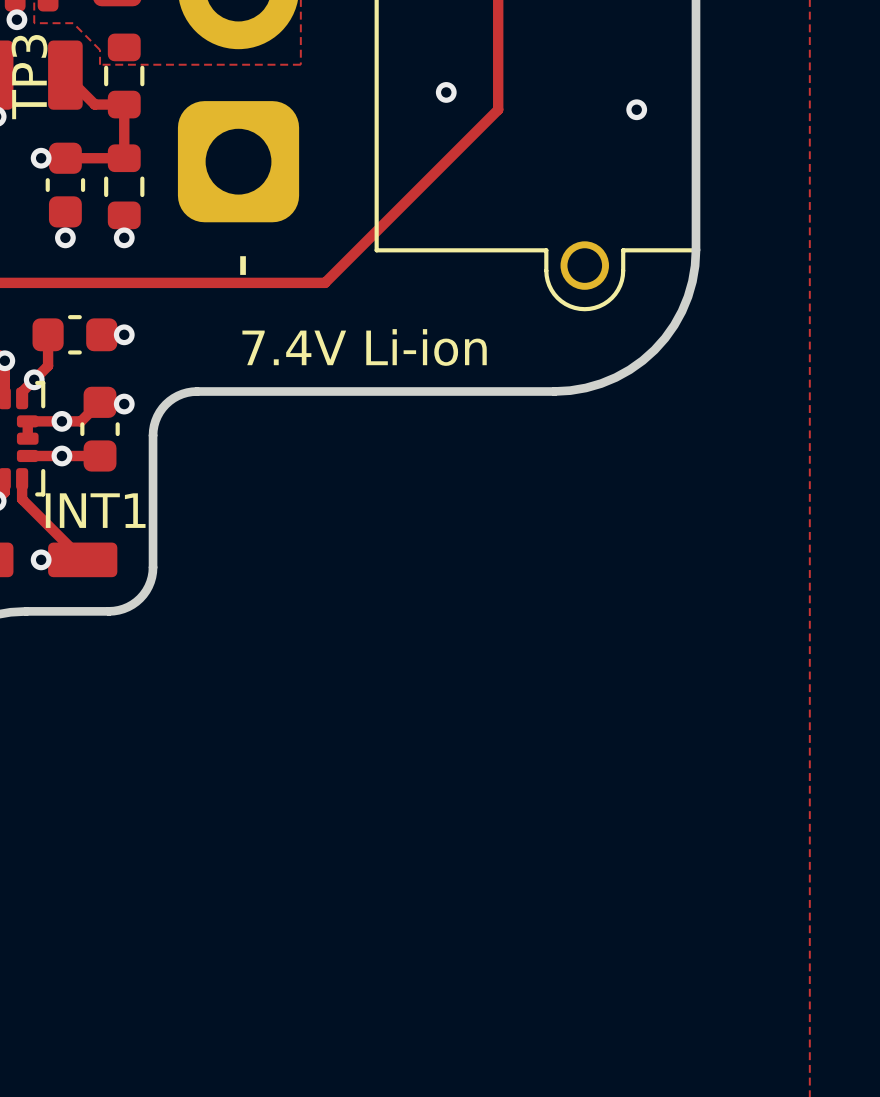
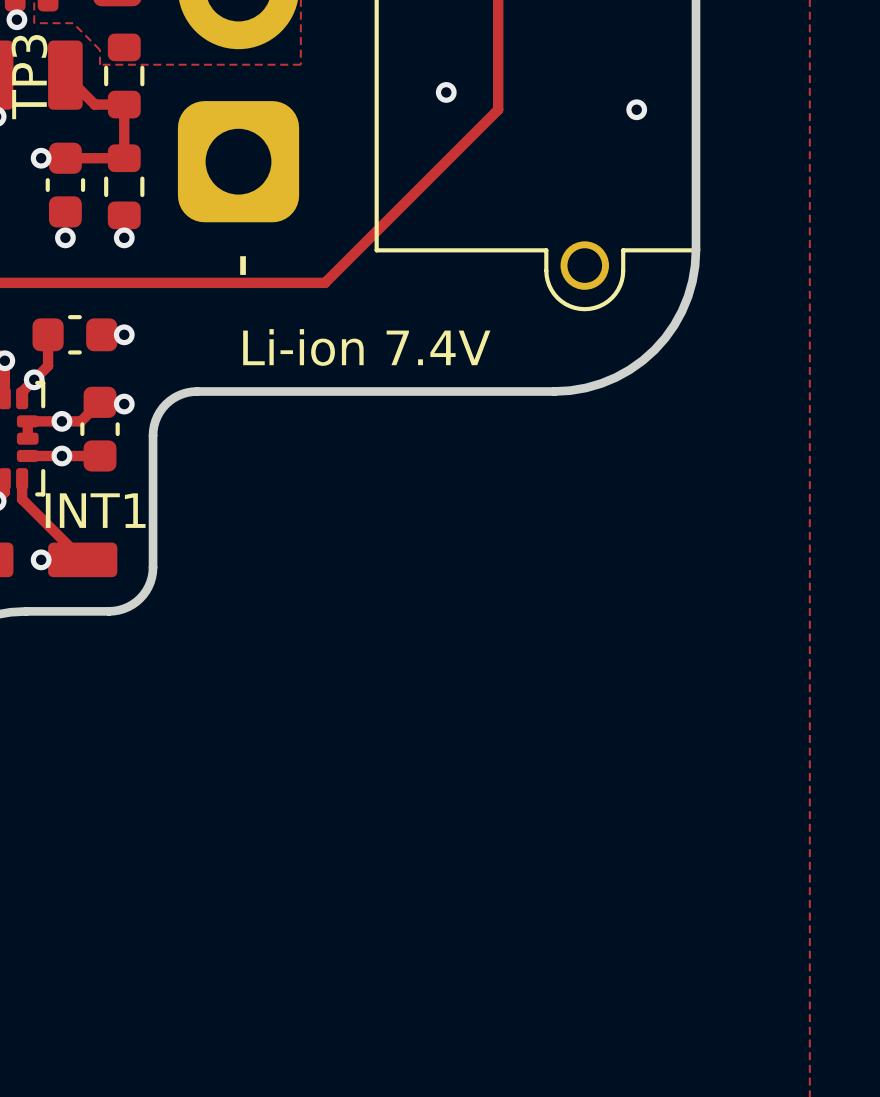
text: 7.4V Li-ion (364, 347) -> Li-ion 7.4V (366, 347)

